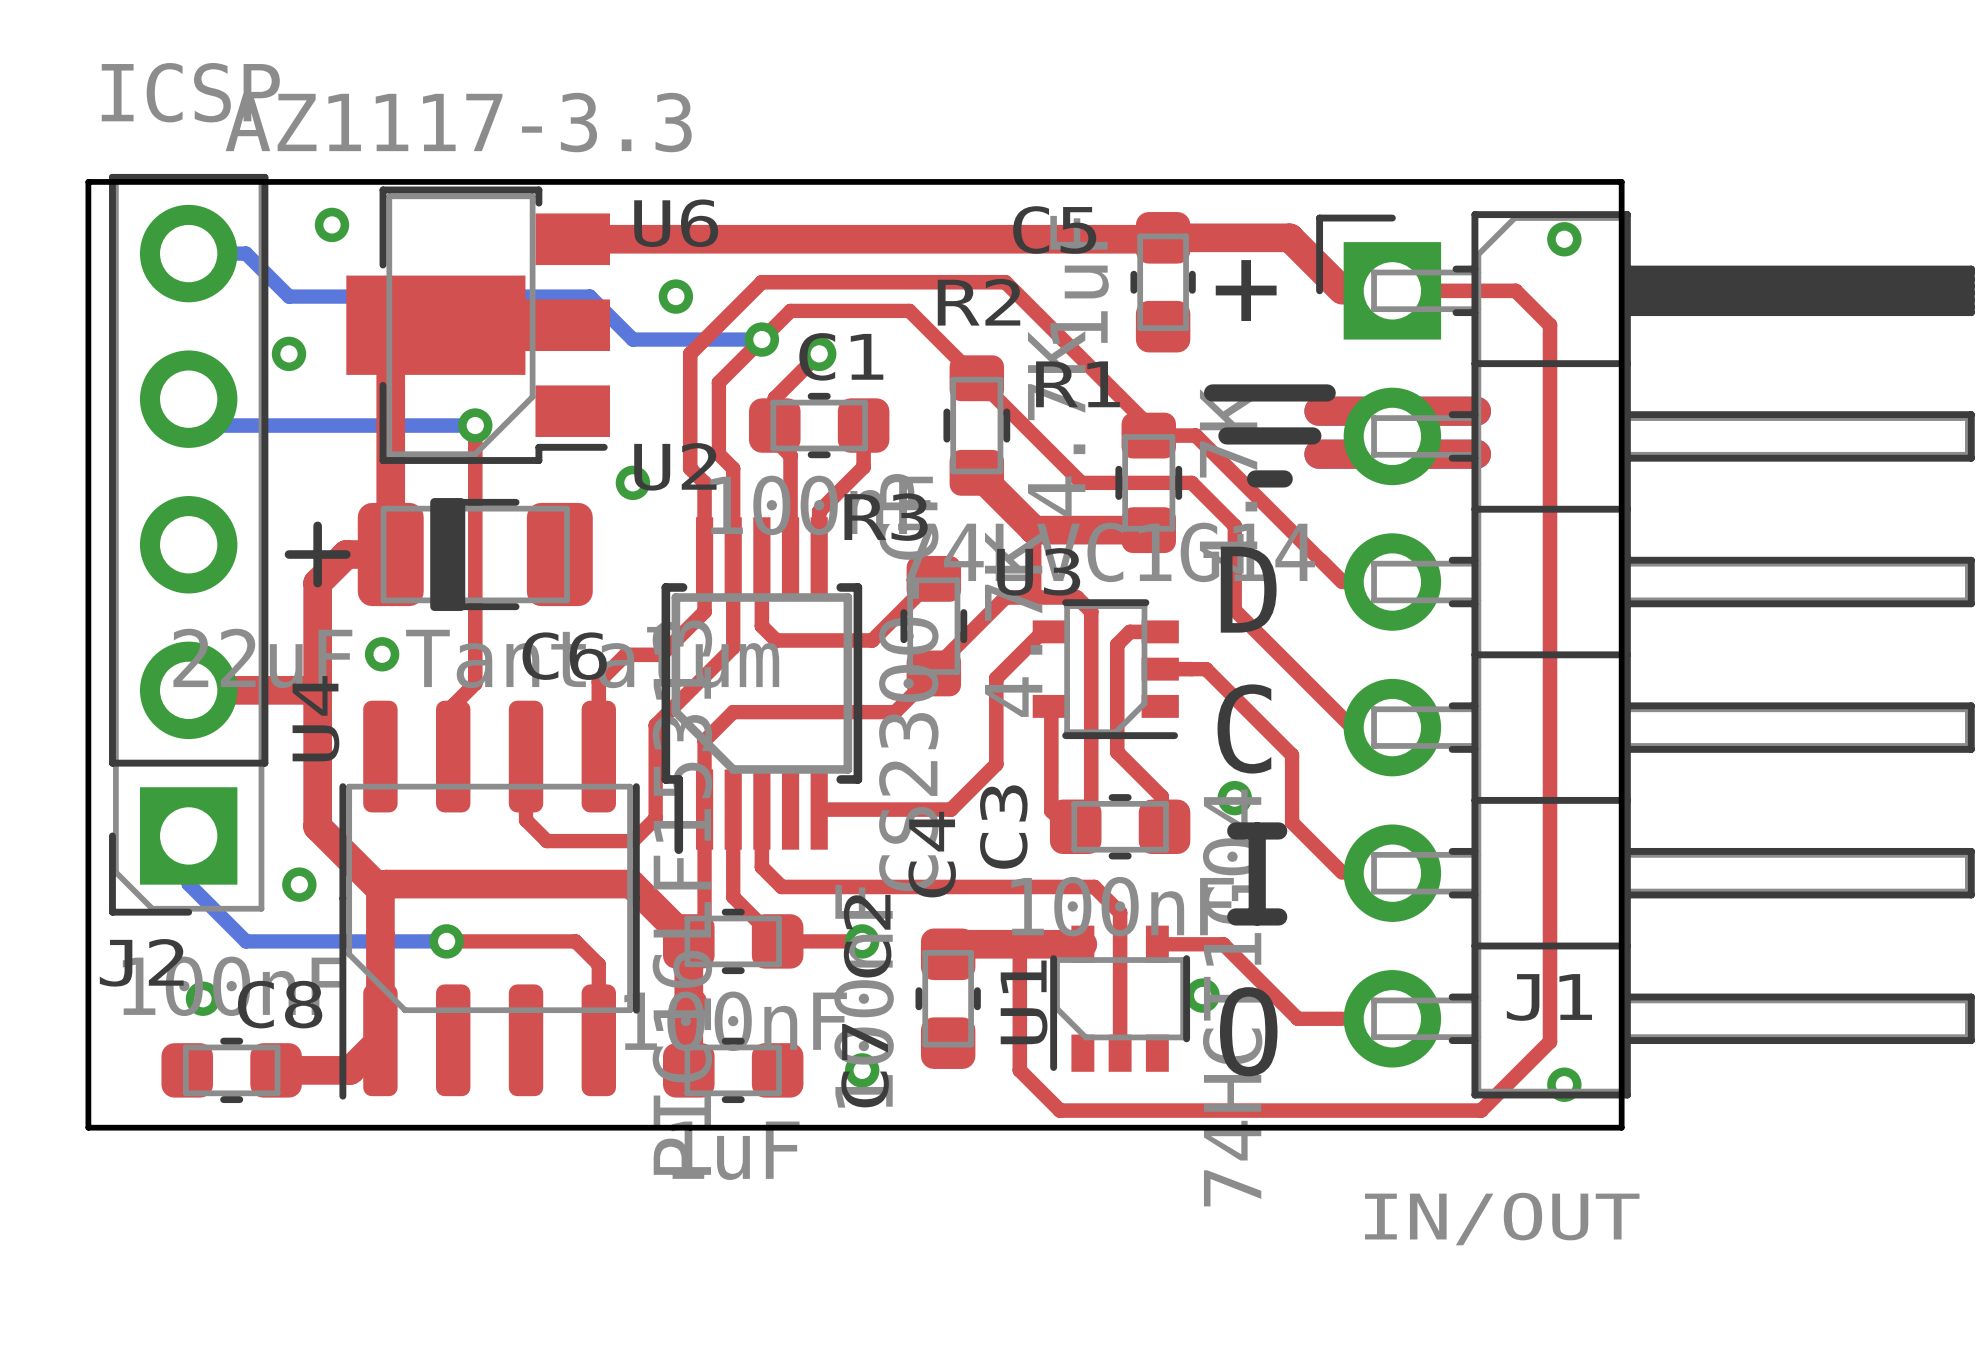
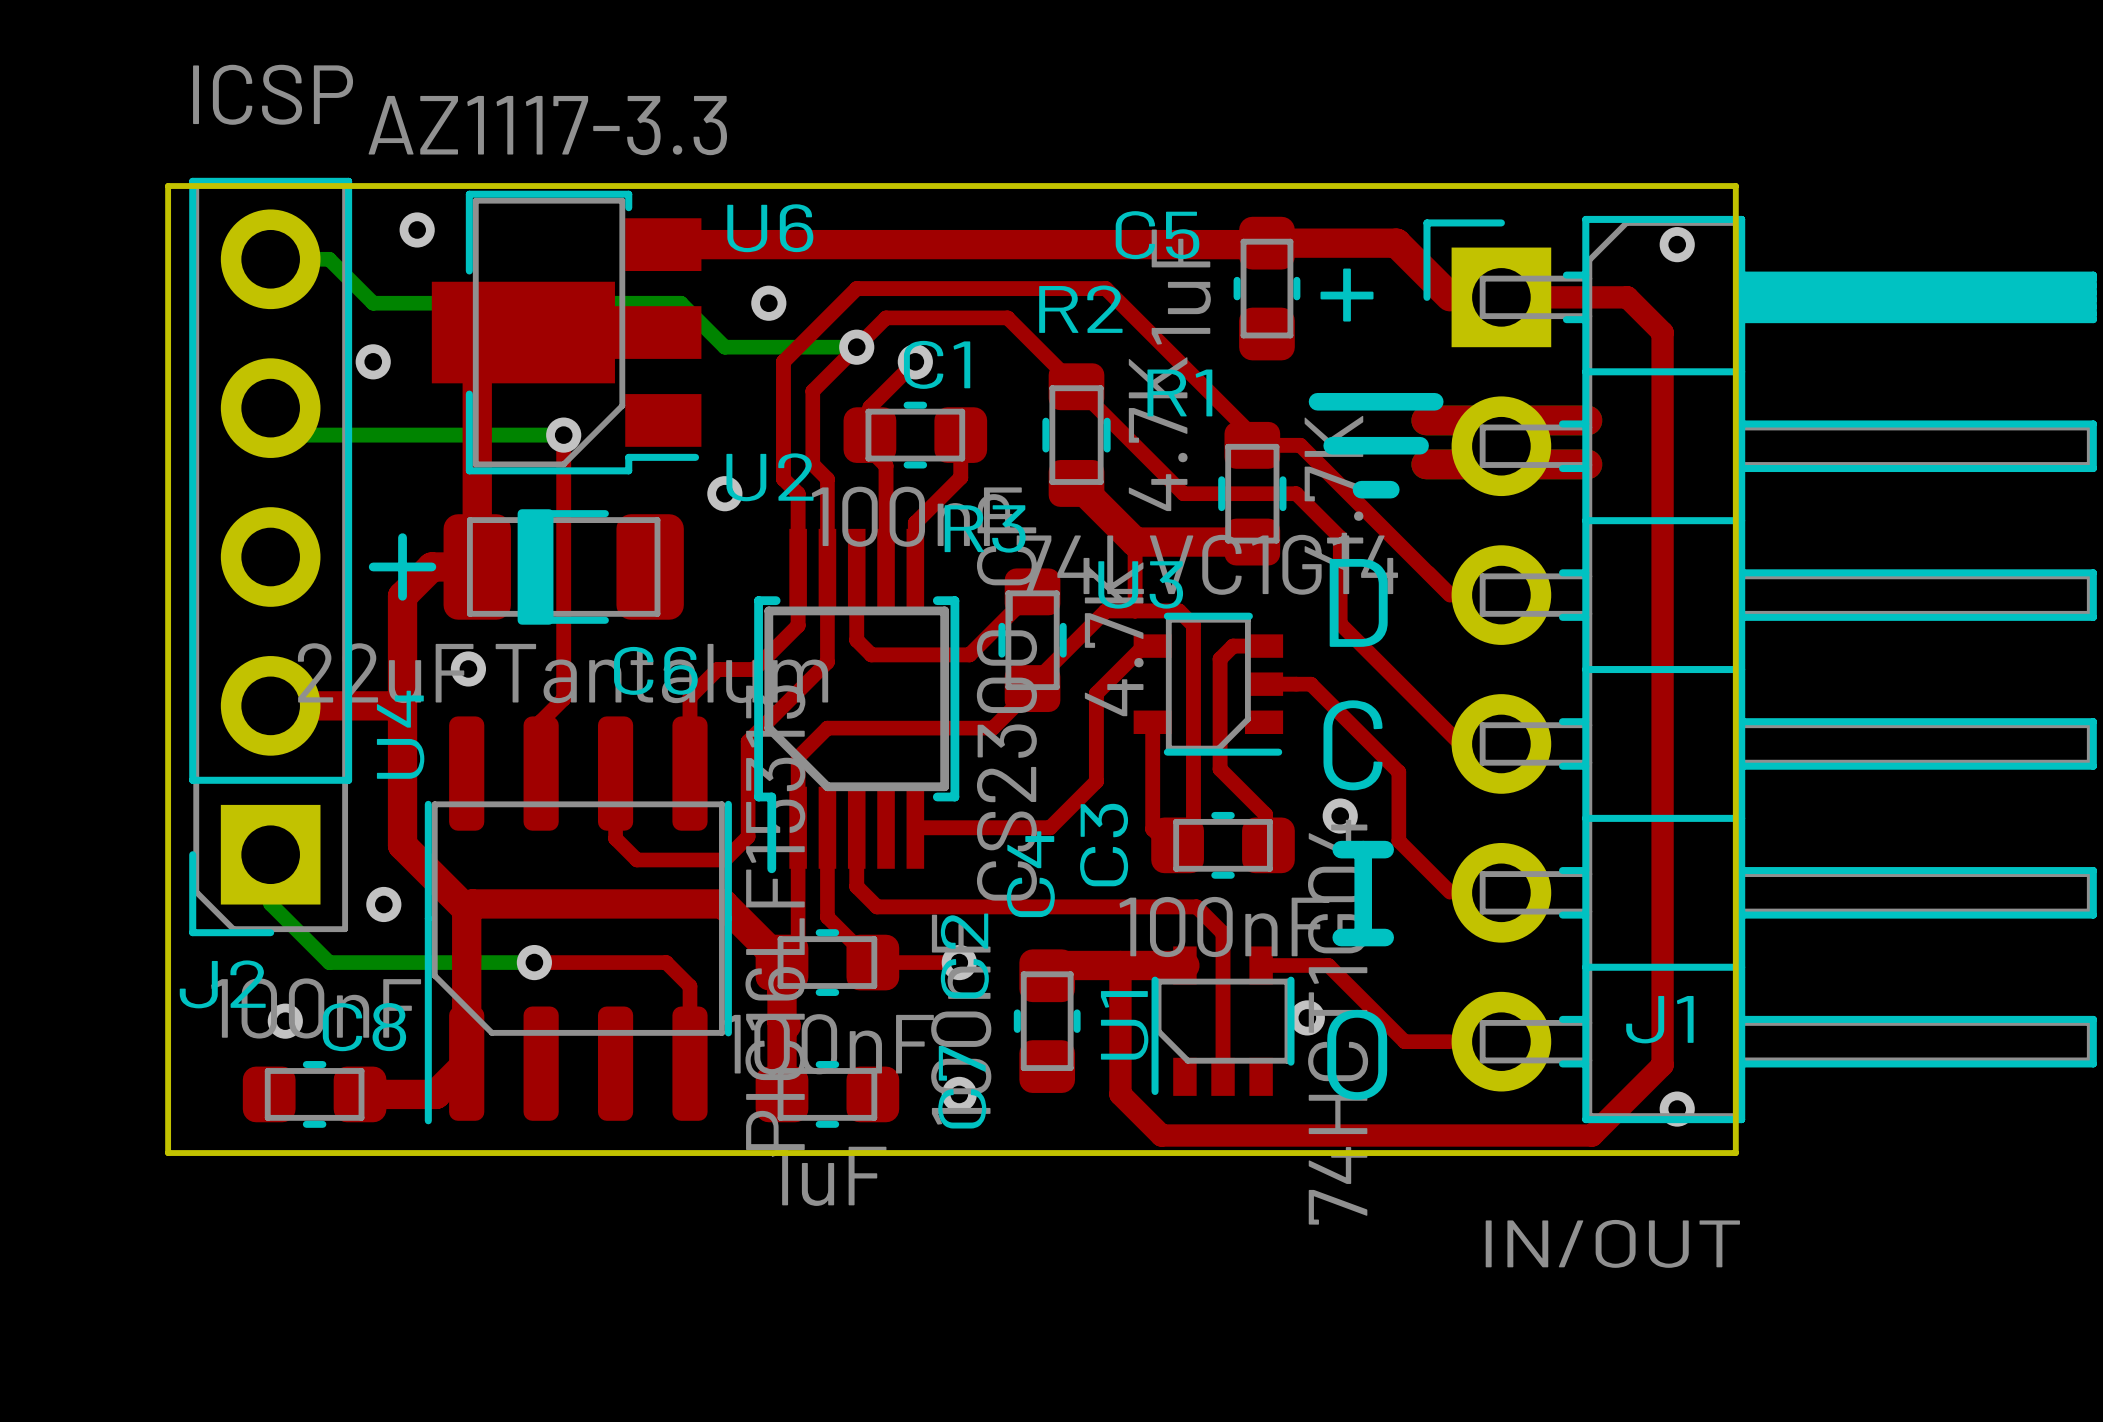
top track width: thin (1392, 290) (1515, 290) (1550, 325) (1550, 1041) (1481, 1110) (1060, 1110) (1019, 1070) (1019, 944) -> thick (1501, 297) (1627, 297) (1662, 332) (1662, 1065) (1592, 1135) (1161, 1135) (1120, 1094) (1120, 965)

